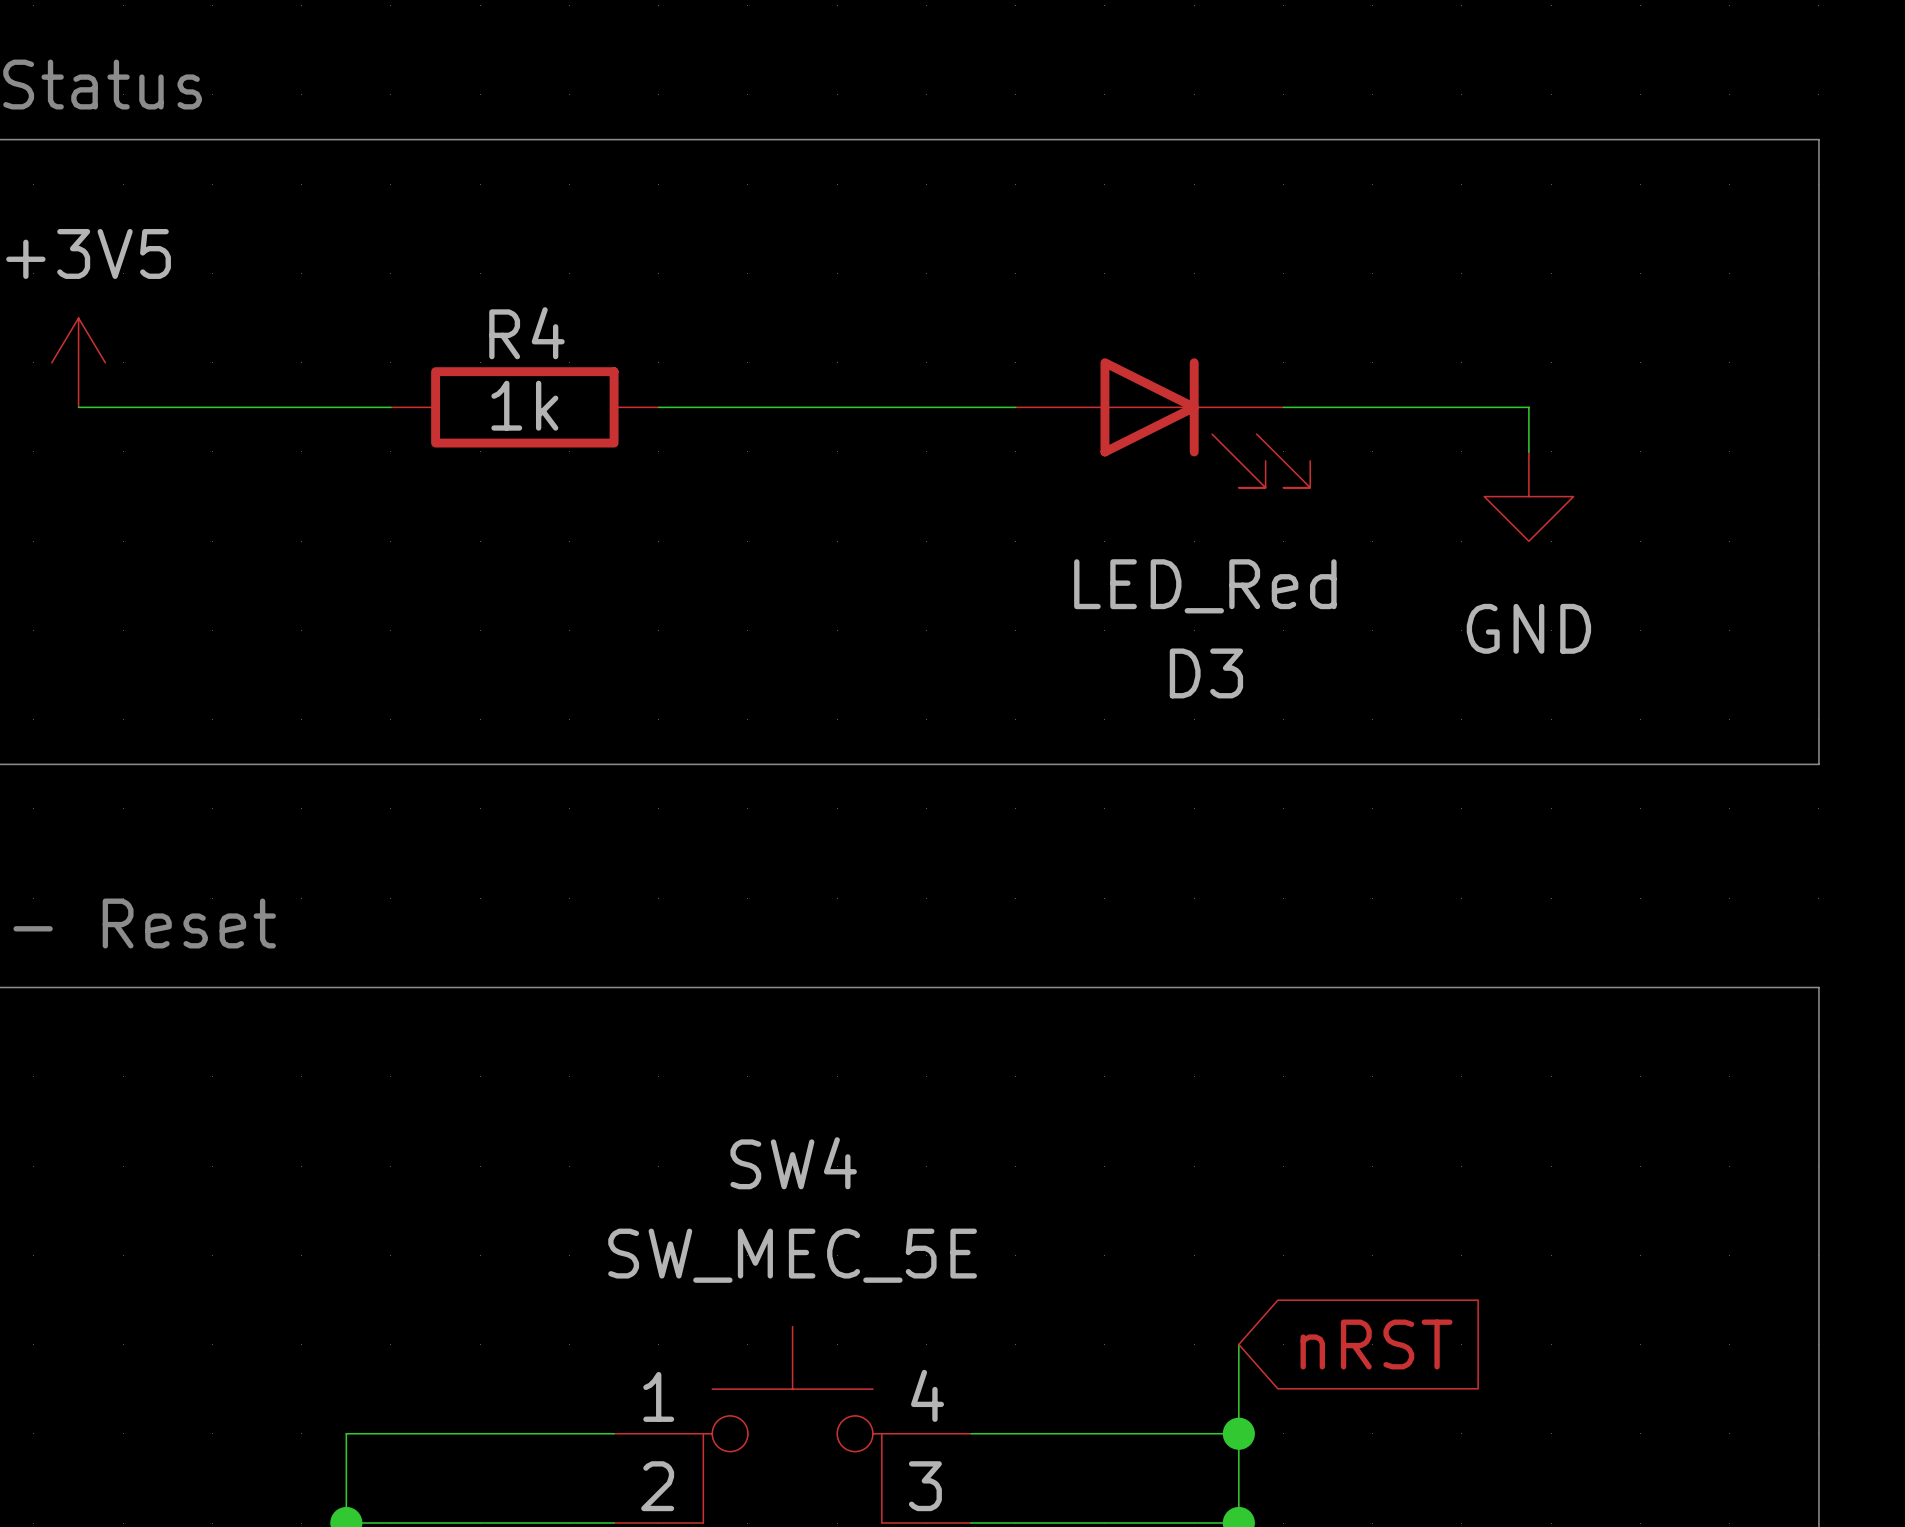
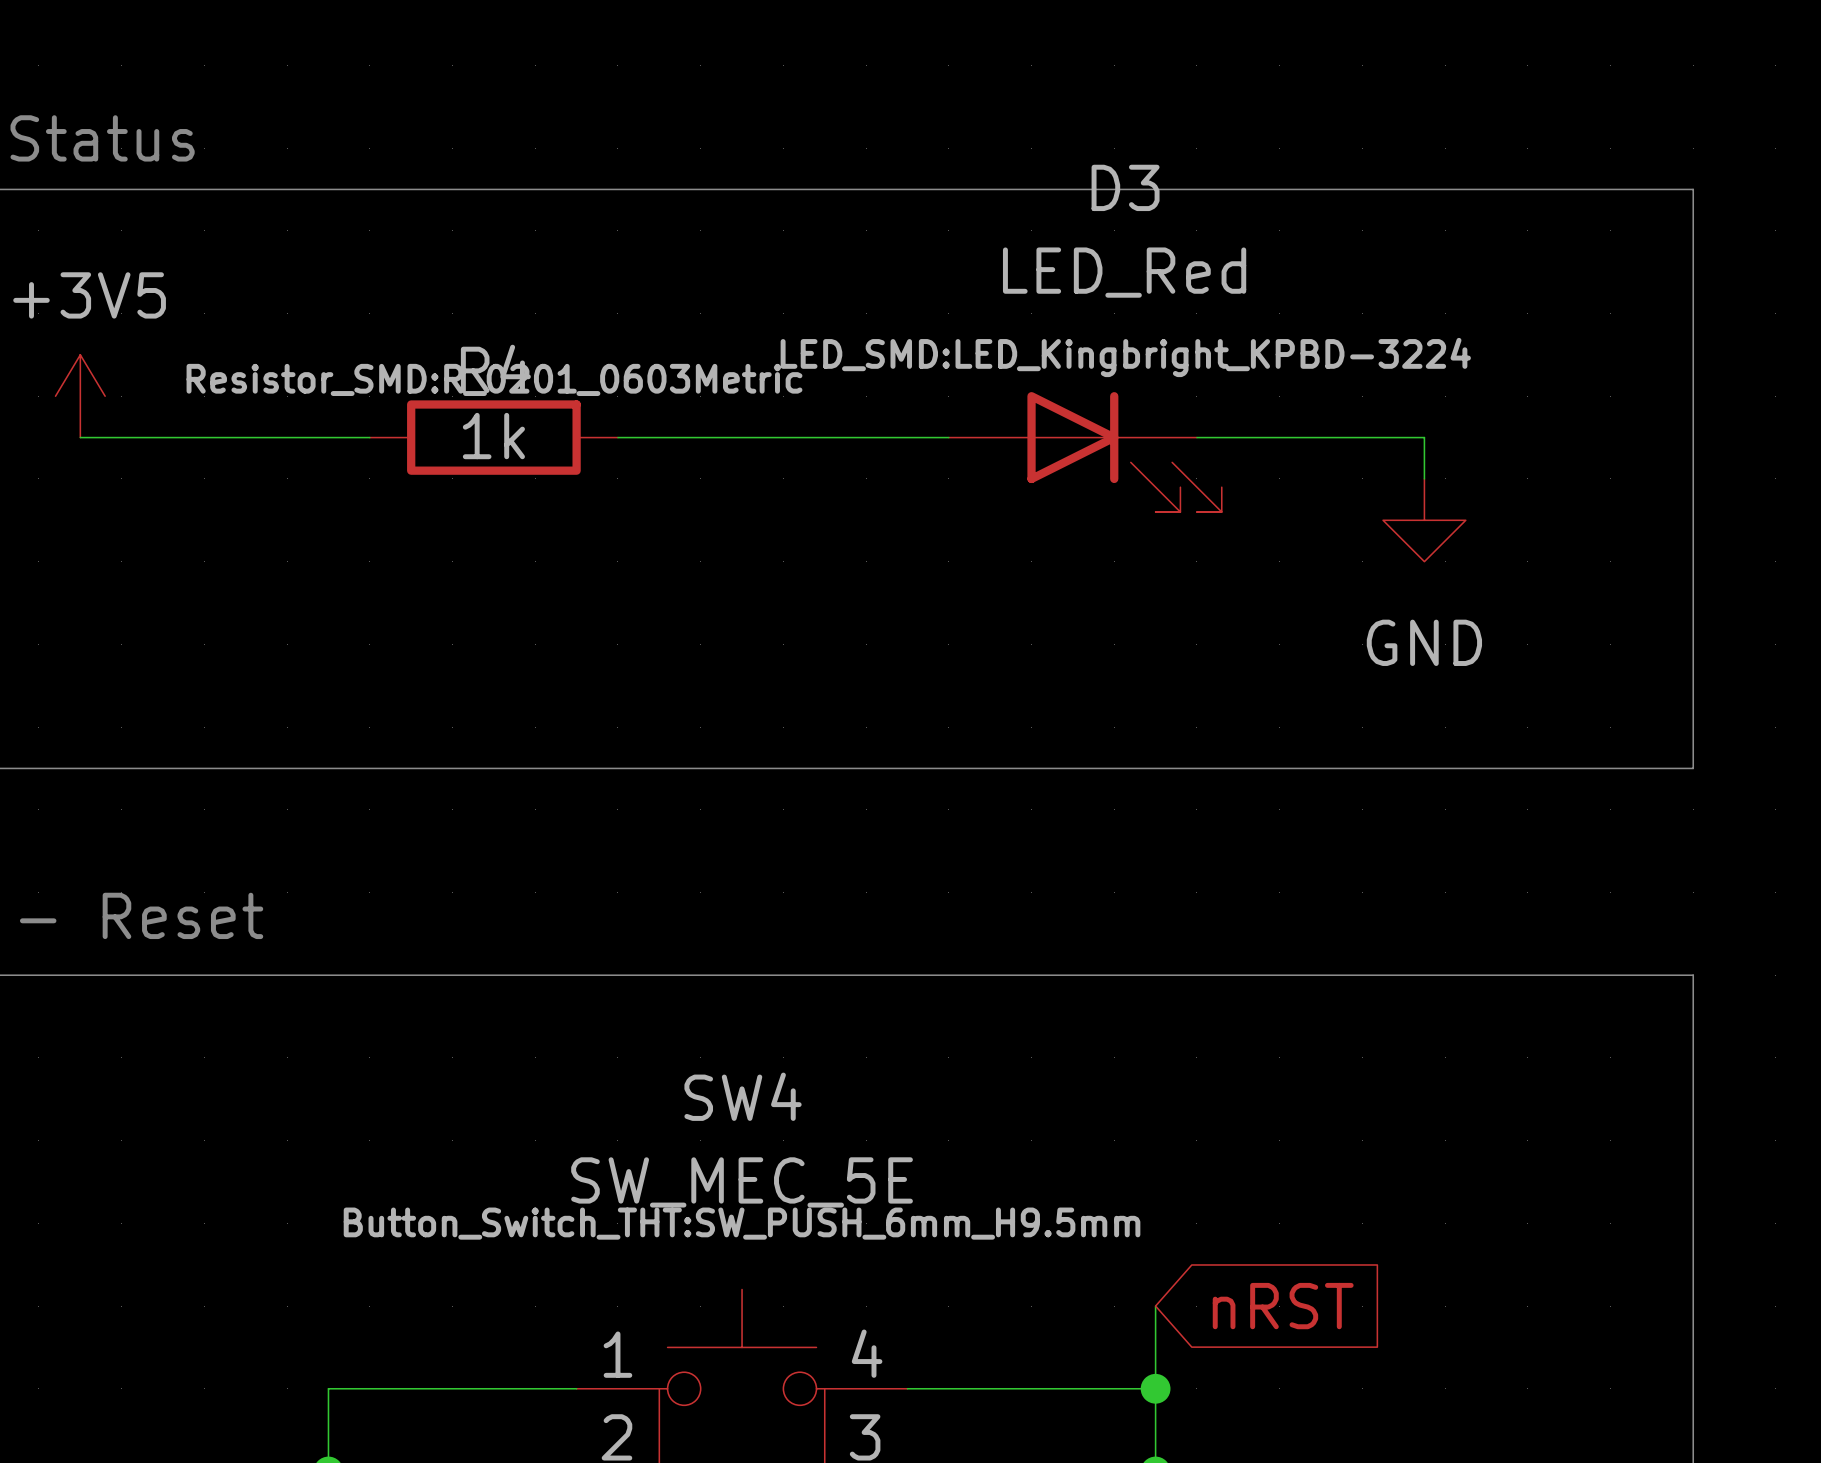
D3 text: none -> LED_SMD:LED_Kingbright_KPBD-3224 (1125, 357)
R4 text: none -> Resistor_SMD:R_0201_0603Metric (494, 379)
D3 value position: LED_Red (1205, 586) -> LED_Red (1124, 272)
D3 name position: D3 (1206, 673) -> D3 (1125, 187)
SW4 name position: SW4 (793, 1163) -> SW4 (743, 1096)
SW4 text: none -> Button_Switch_THT:SW_PUSH_6mm_H9.5mm (742, 1223)
SW4 value position: SW_MEC_5E (792, 1255) -> SW_MEC_5E (742, 1182)

